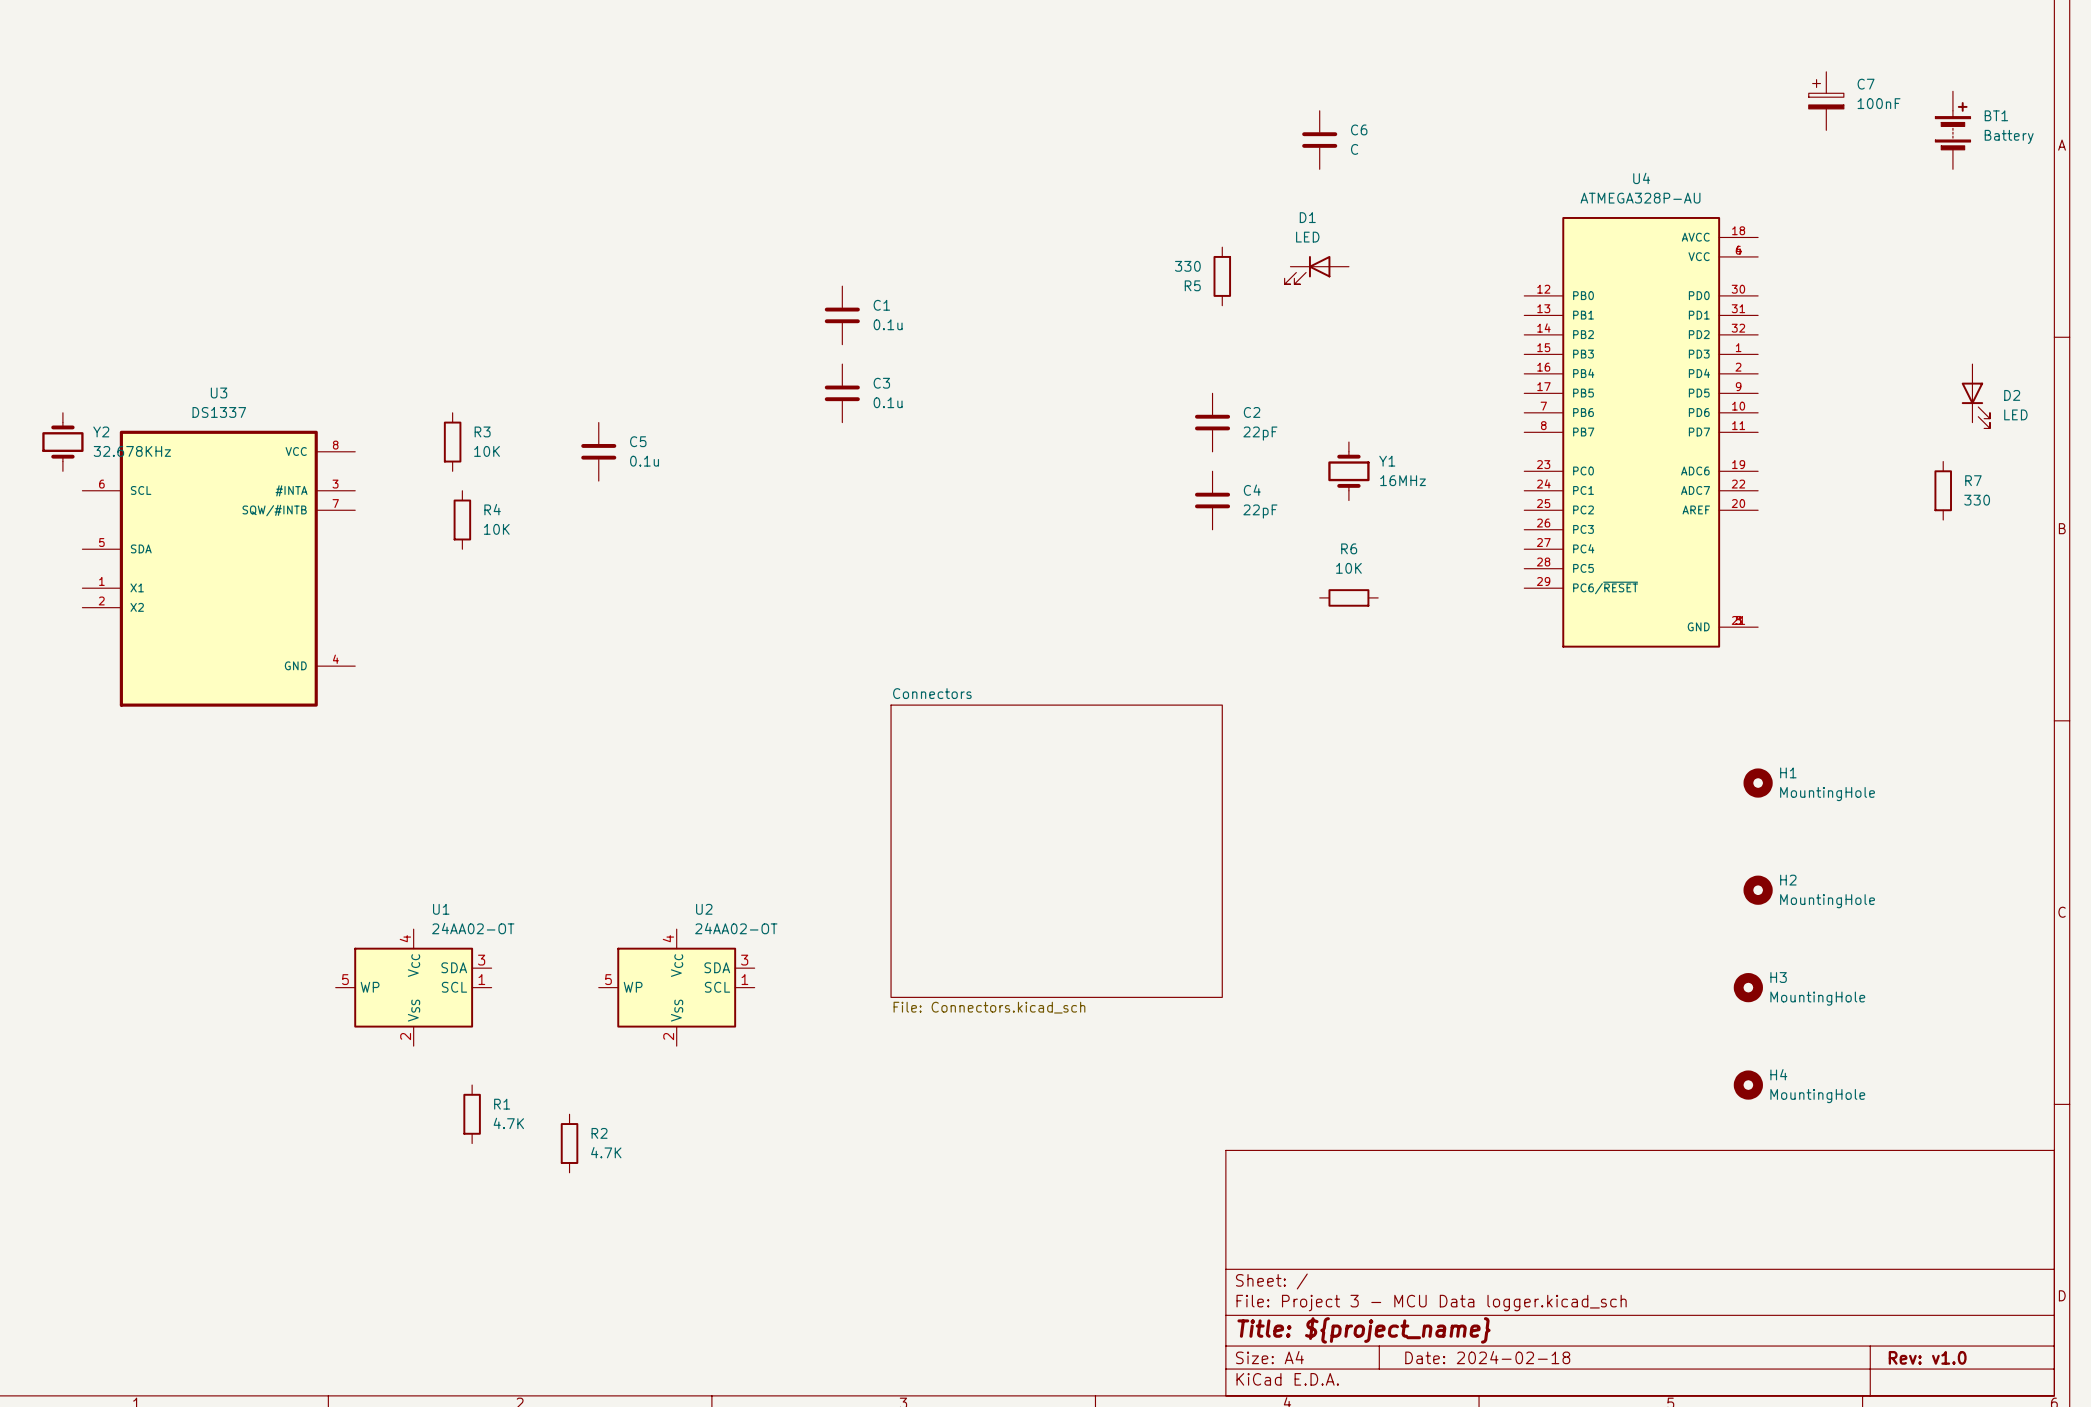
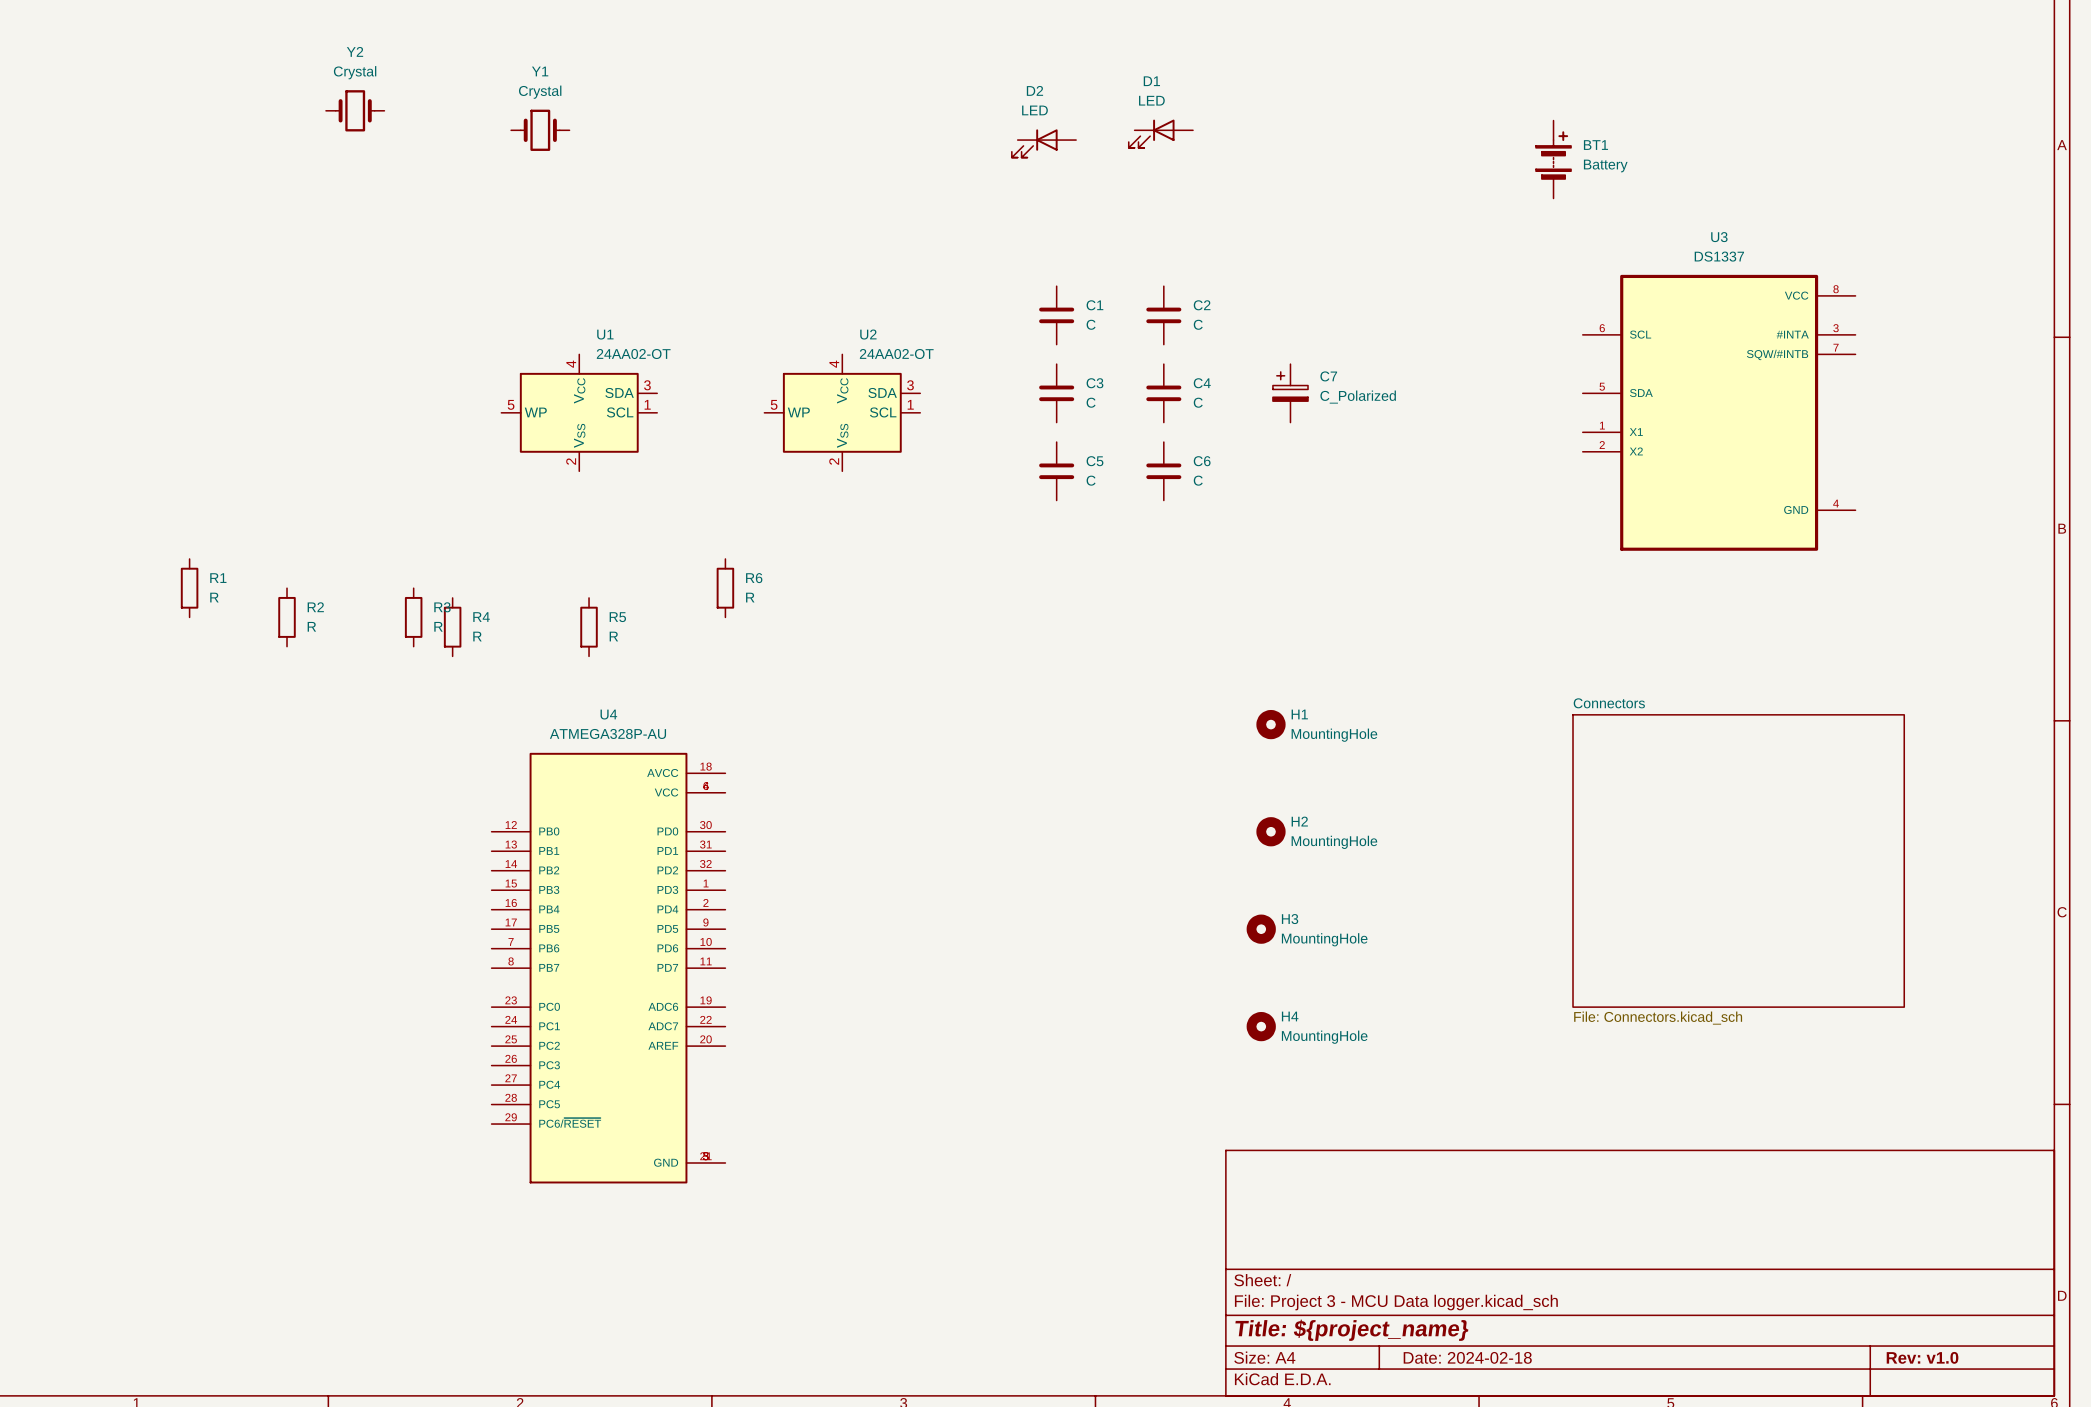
C7 position: (1826, 101) -> (1290, 393)
C7 value: 100nF (1879, 103) -> C_Polarized (1358, 397)
BT1 position: (1952, 130) -> (1553, 159)
C6 position: (1319, 140) -> (1163, 471)
R5 value: 330 (1187, 266) -> R (613, 636)
D1 position: (1316, 270) -> (1160, 133)
R5 position: (1222, 276) -> (589, 627)
R5 name position: R5 (1192, 285) -> R5 (617, 617)
C1 position: (842, 315) -> (1056, 315)
C1 value: 0.1u (888, 324) -> C (1091, 324)
C3 position: (842, 393) -> (1056, 393)
D2 name position: D2 (2012, 395) -> D2 (1034, 90)
D2 position: (1975, 396) -> (1043, 143)
C3 value: 0.1u (888, 402) -> C (1091, 402)
D2 rotation: 0° (1975, 405) -> 90° clockwise (1034, 143)
D2 value position: LED (2015, 414) -> LED (1034, 110)
C2 position: (1212, 422) -> (1163, 315)
Y2 name position: Y2 (101, 431) -> Y2 (355, 51)
U4 position: (1641, 432) -> (608, 968)
C2 value: 22pF (1260, 433) -> C (1198, 324)
Y2 rotation: 0° (62, 442) -> 90° clockwise (355, 110)
Y2 position: (62, 442) -> (355, 110)
R3 position: (452, 442) -> (413, 617)
Y2 value: 32.678KHz (132, 451) -> Crystal (355, 72)
R3 value: 10K (487, 451) -> R (438, 626)
C5 position: (598, 451) -> (1056, 471)
C5 value: 0.1u (644, 461) -> C (1091, 480)
Y1 name position: Y1 (1387, 461) -> Y1 (540, 71)
Y1 rotation: 0° (1348, 471) -> 90° clockwise (540, 130)
Y1 position: (1348, 471) -> (540, 130)
Y1 value: 16MHz (1403, 480) -> Crystal (540, 92)
R7: 330 (1943, 490) -> none
C4 position: (1212, 500) -> (1163, 393)
C4 value: 22pF (1260, 511) -> C (1198, 402)
R4 position: (462, 519) -> (452, 627)
R4 value: 10K (496, 529) -> R (477, 636)
R6 name position: R6 (1349, 548) -> R6 (754, 578)
U3 position: (218, 568) -> (1719, 412)
R6 value: 10K (1348, 568) -> R (750, 597)
R6 rotation: 0° (1348, 597) -> 90° clockwise (725, 588)
R6 position: (1348, 597) -> (725, 588)
H1 position: (1758, 783) -> (1270, 724)
sheet Connectors: File: Connectors.kicad_sch (1056, 851) -> none
sheet Connectors: none -> File: Connectors.kicad_sch (1738, 860)
H2 position: (1758, 890) -> (1270, 831)
U1 position: (413, 987) -> (579, 412)
U2 position: (676, 987) -> (842, 412)
H3 position: (1748, 987) -> (1261, 929)
H4 position: (1748, 1085) -> (1261, 1026)
R1 position: (472, 1114) -> (189, 588)
R1 value: 4.7K (508, 1123) -> R (214, 597)
R2 position: (569, 1143) -> (287, 617)
R2 value: 4.7K (606, 1152) -> R (311, 626)

